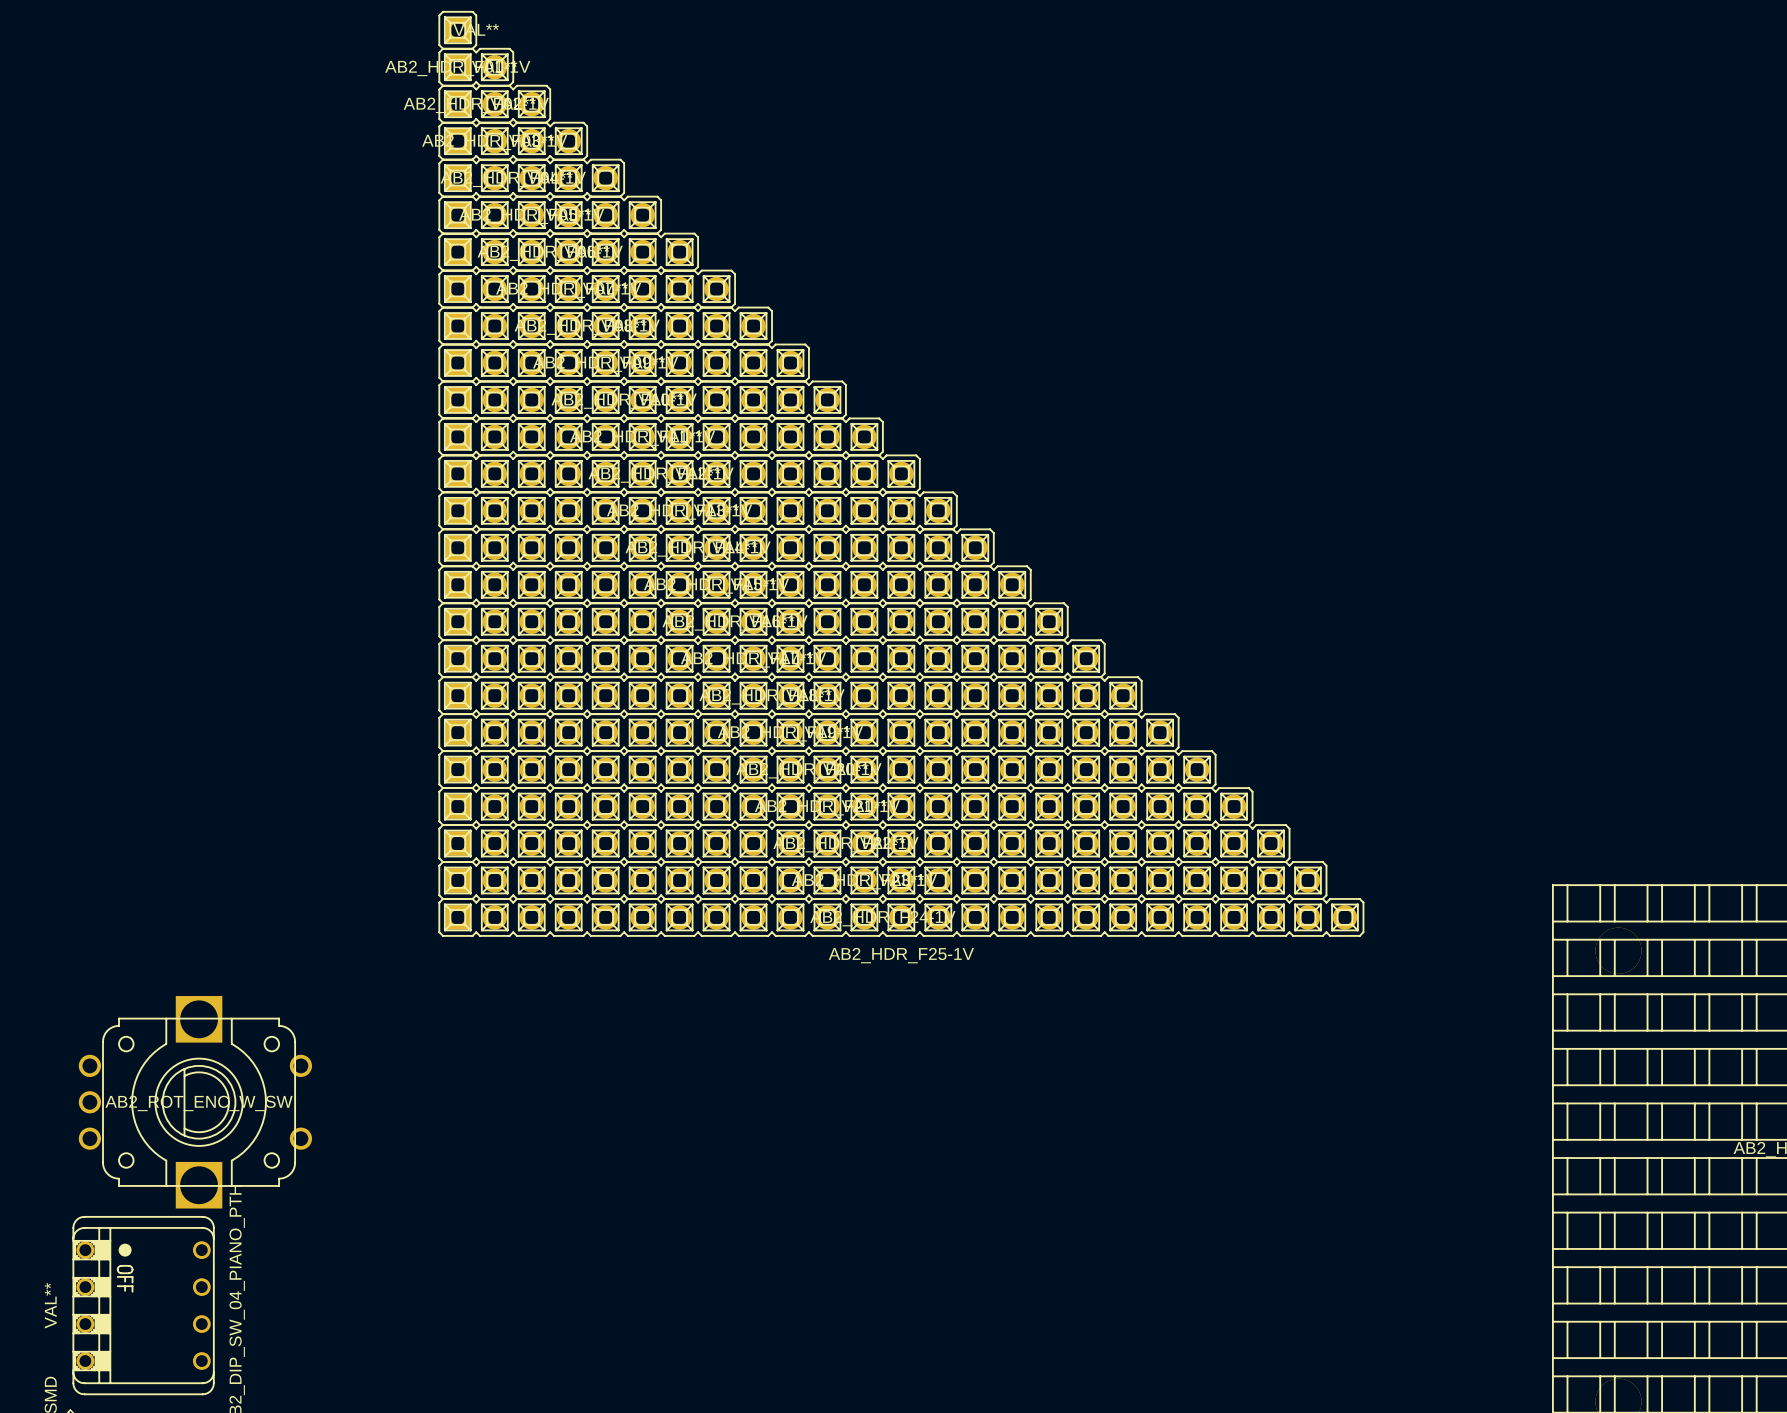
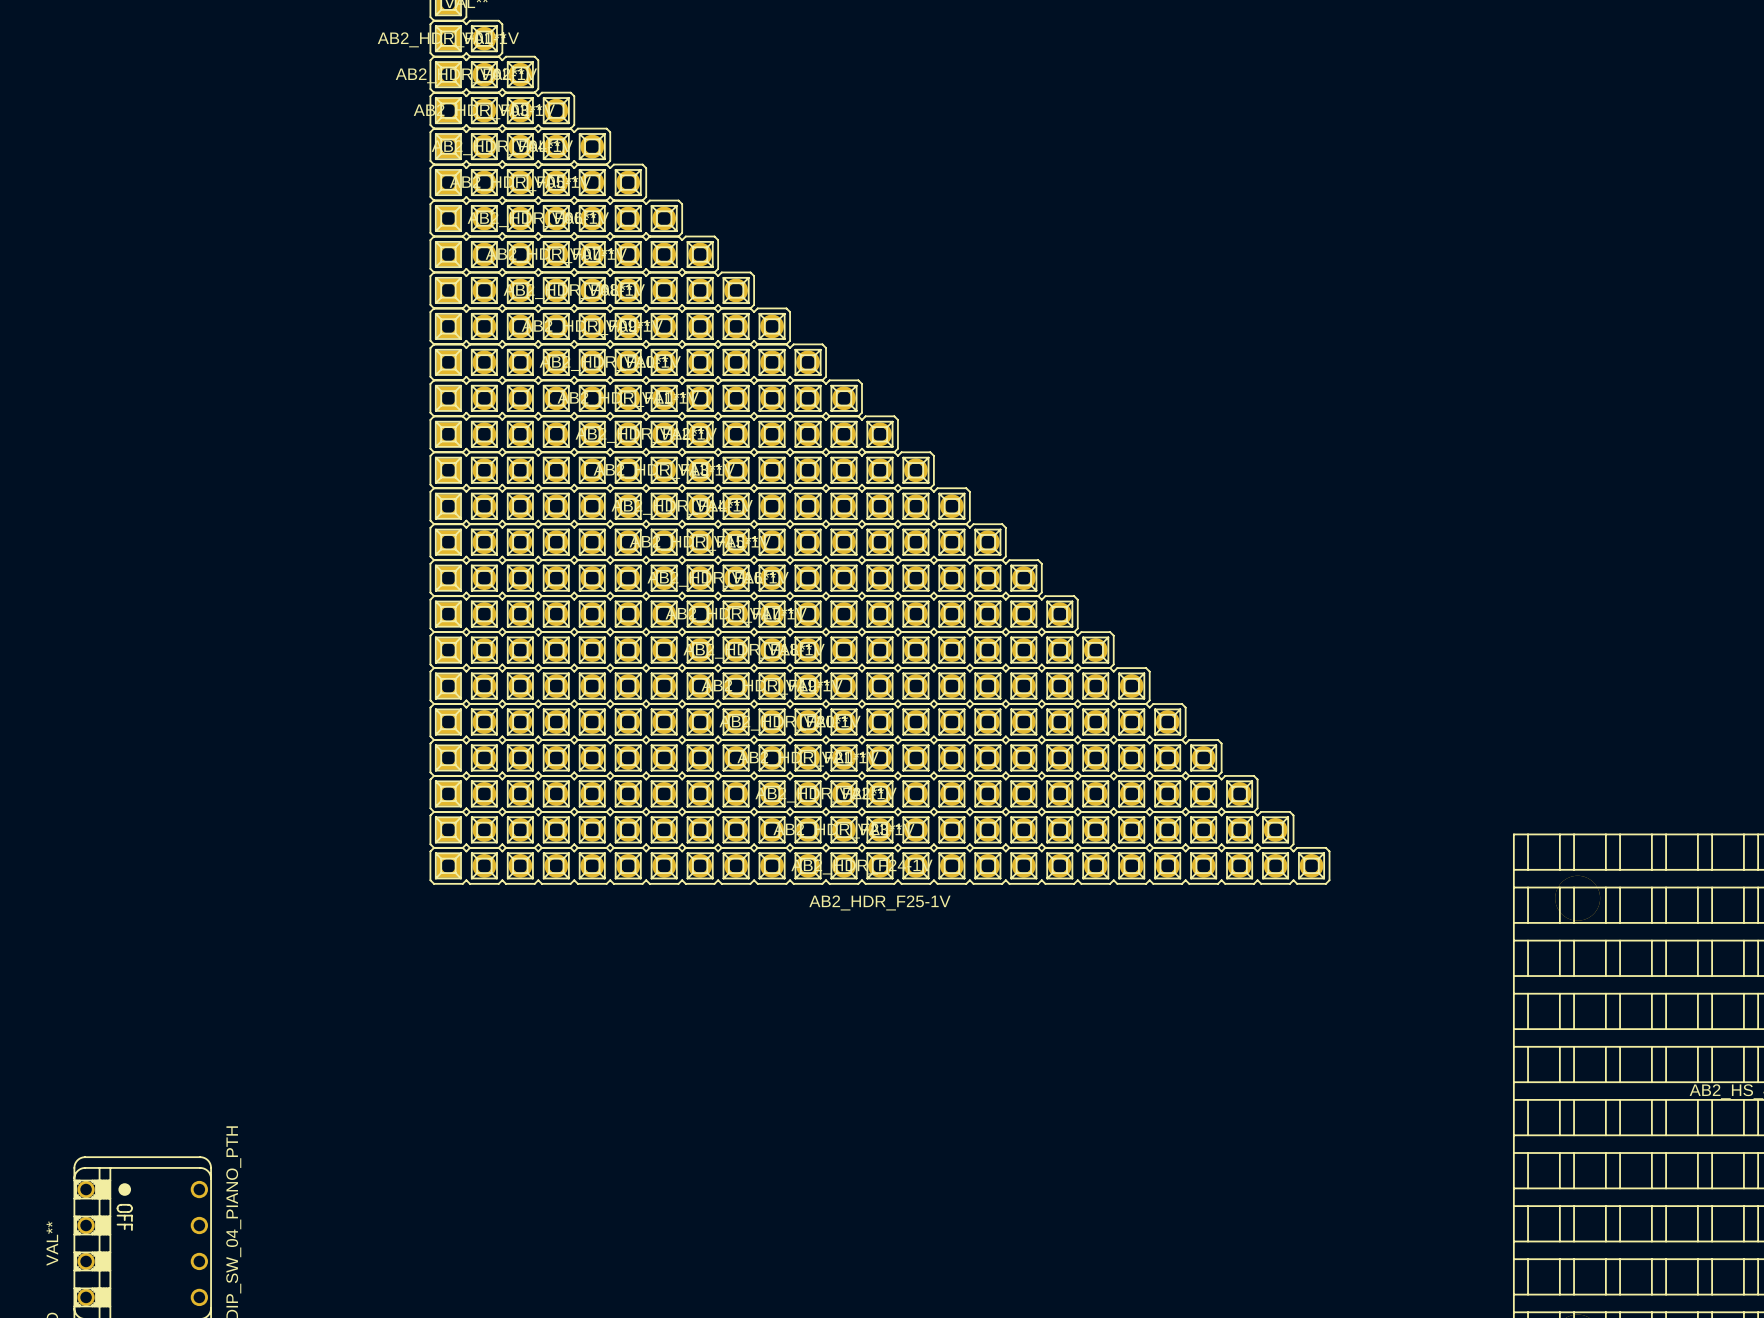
part: AB2_ROT_ENC_W_SW (195, 1102) -> none

